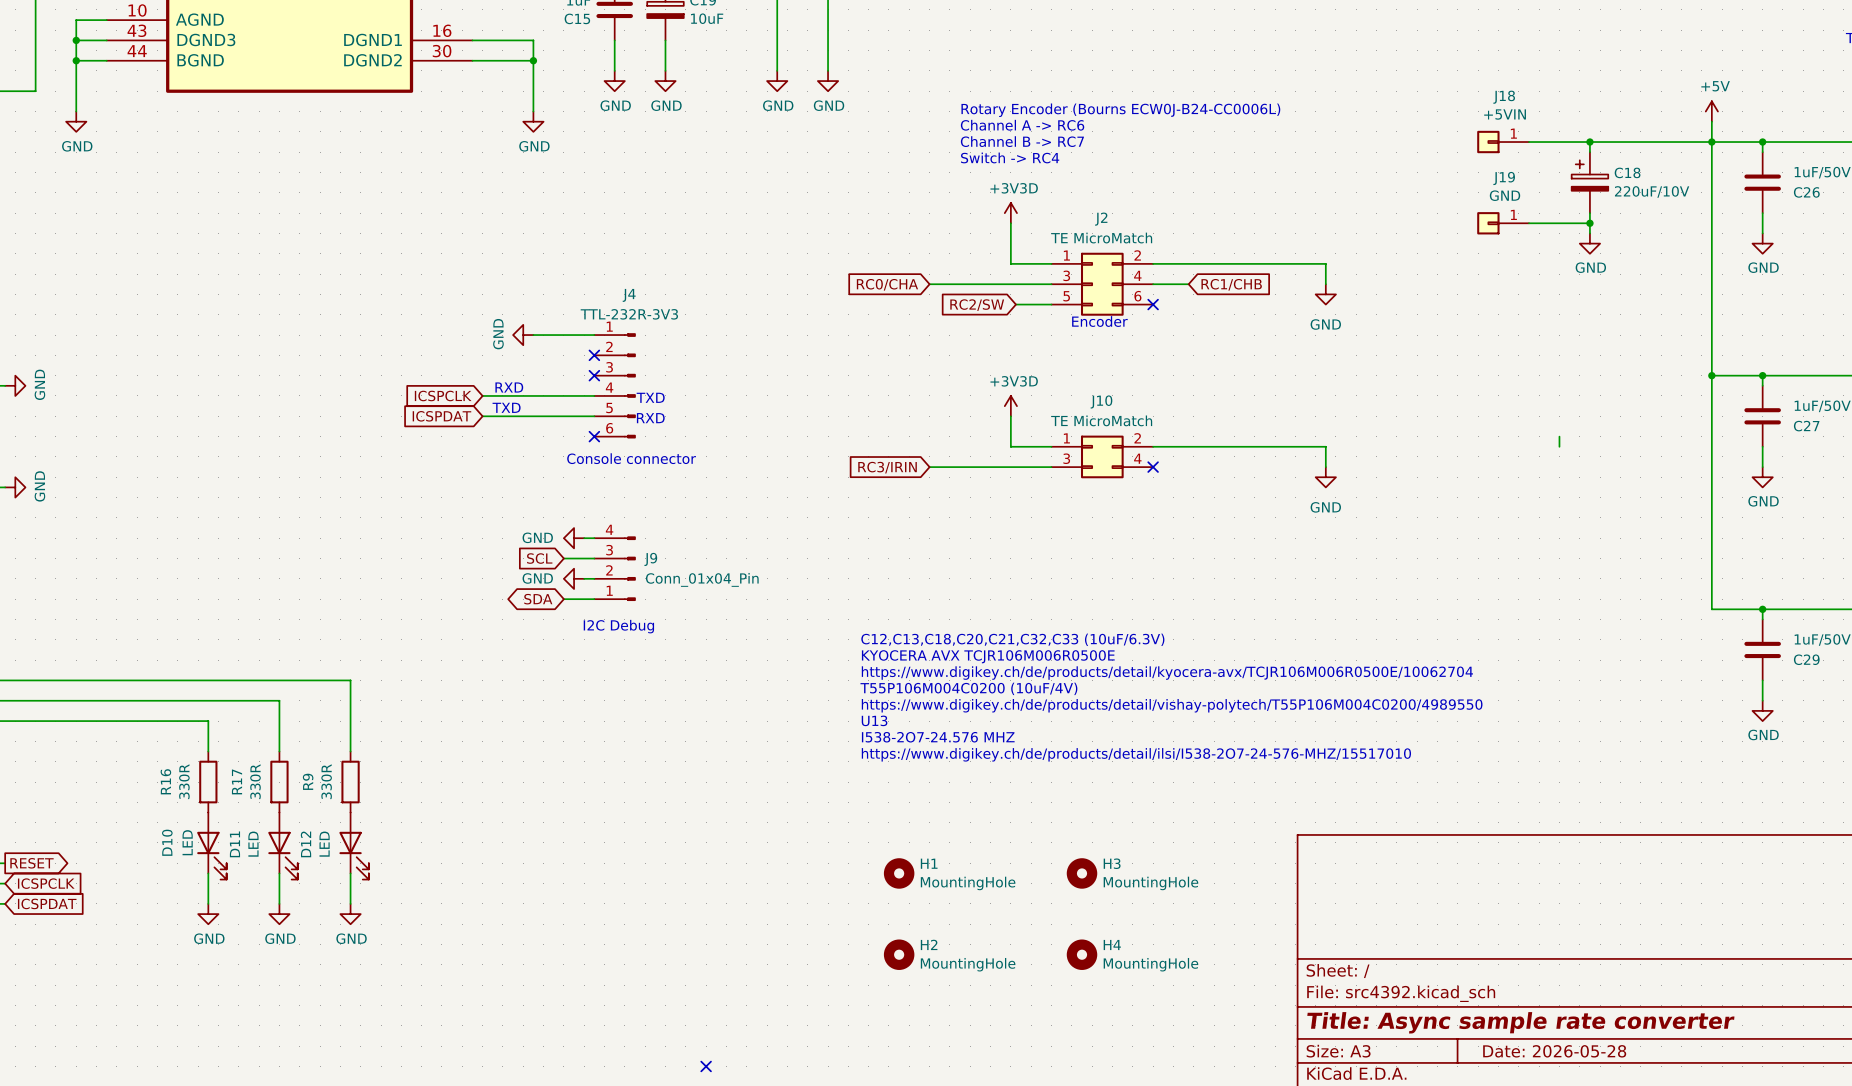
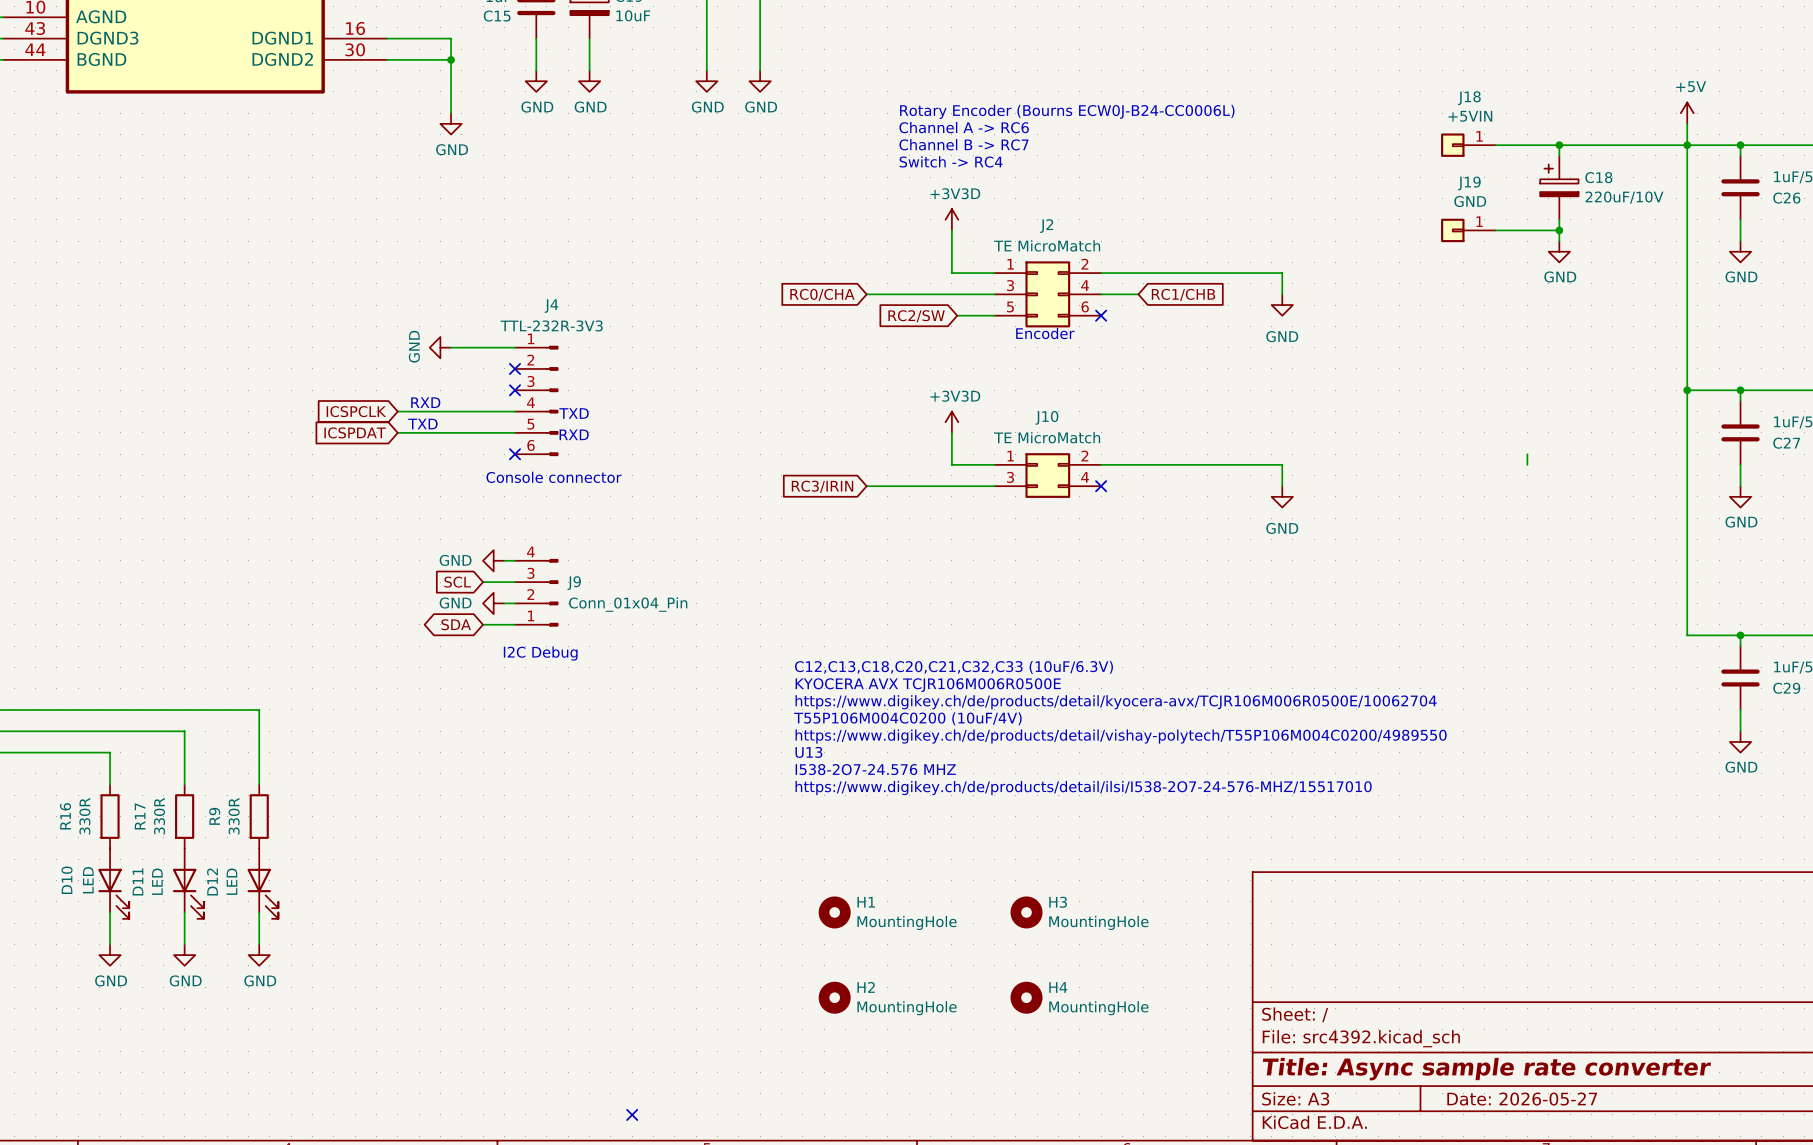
title block: Date: 2026-05-28 (1554, 1051) -> Date: 2026-05-27 (1522, 1099)

